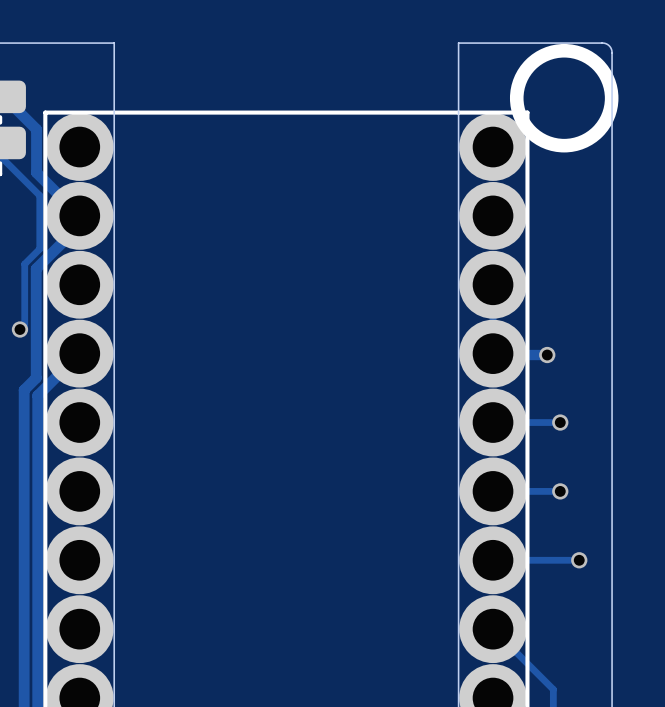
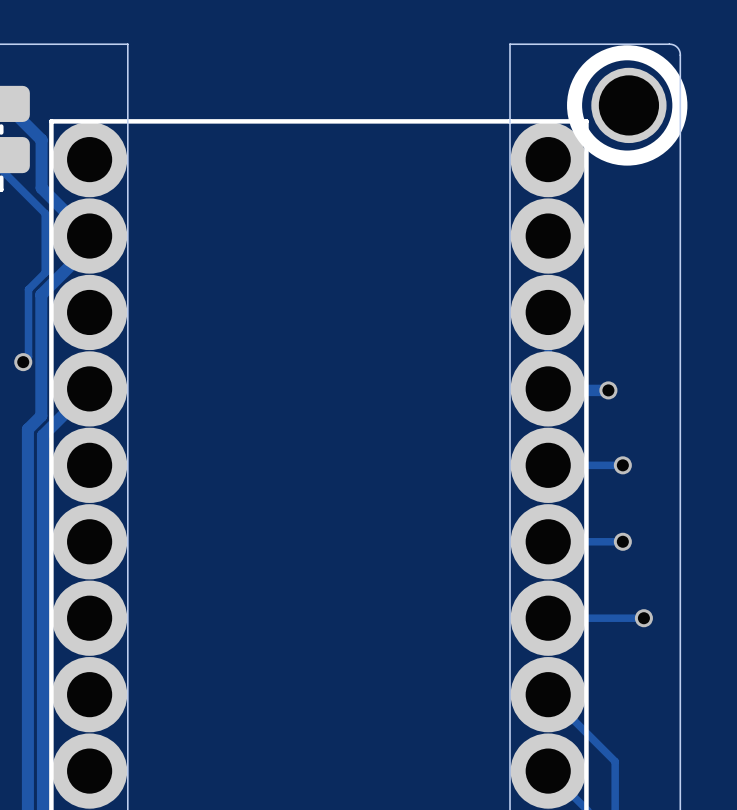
part: none -> (628, 105)

